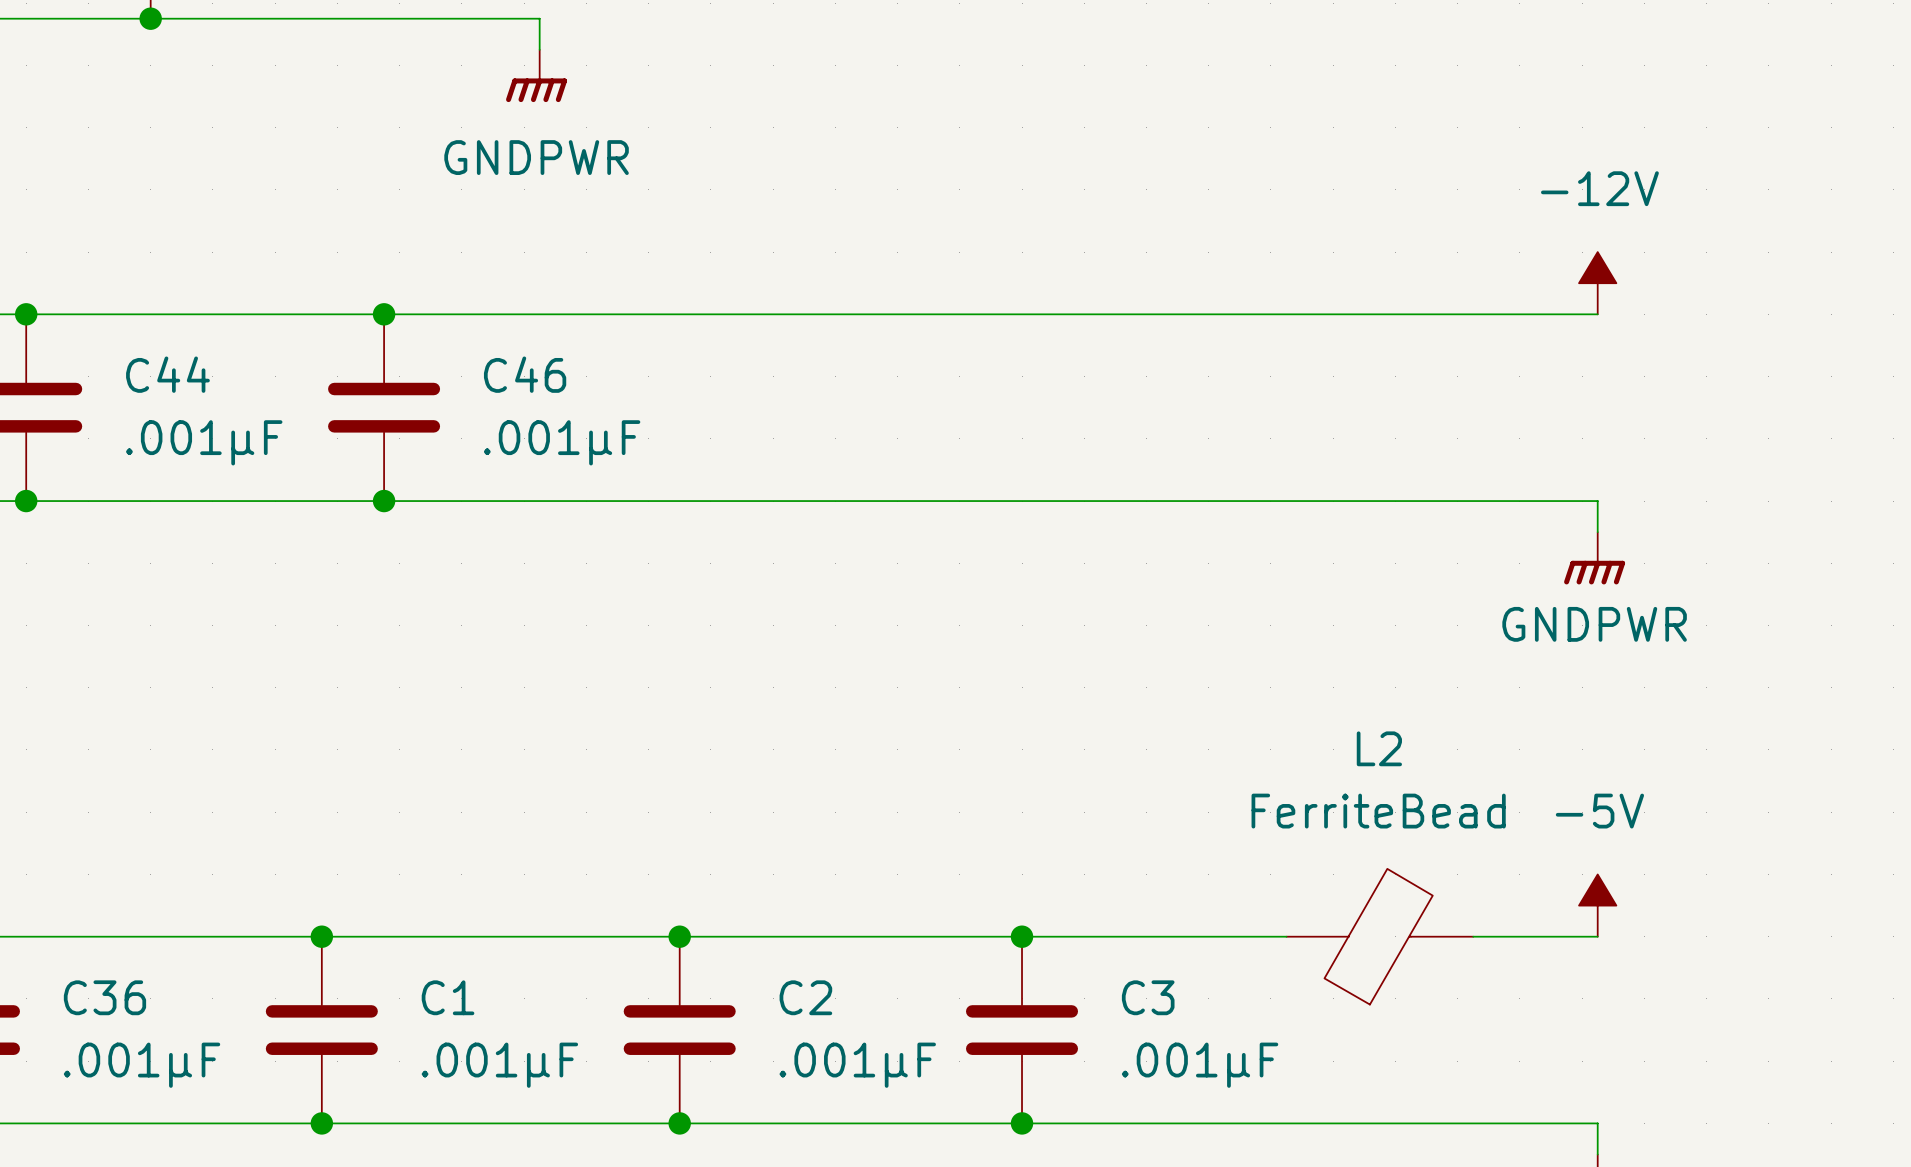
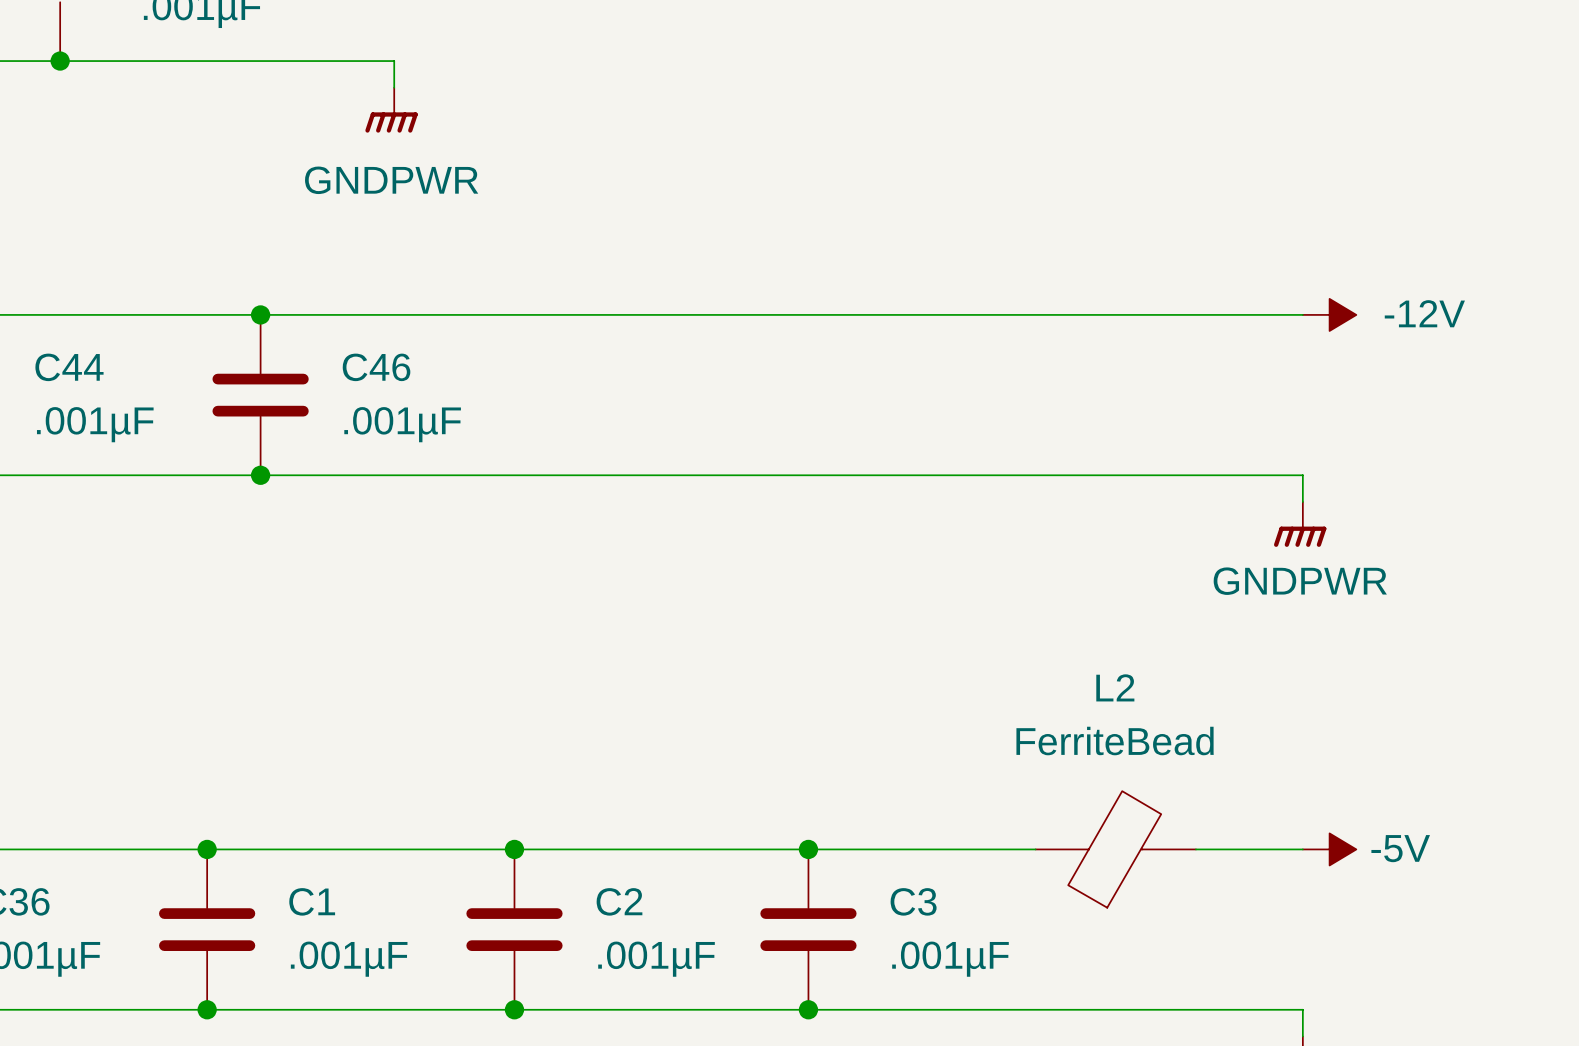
power symbol rotation: 0° (1597, 283) -> 90° clockwise (1329, 314)
power symbol position: -12V (1597, 283) -> -12V (1329, 314)
power symbol rotation: 0° (1597, 905) -> 90° clockwise (1329, 849)
power symbol position: -5V (1597, 905) -> -5V (1329, 849)

